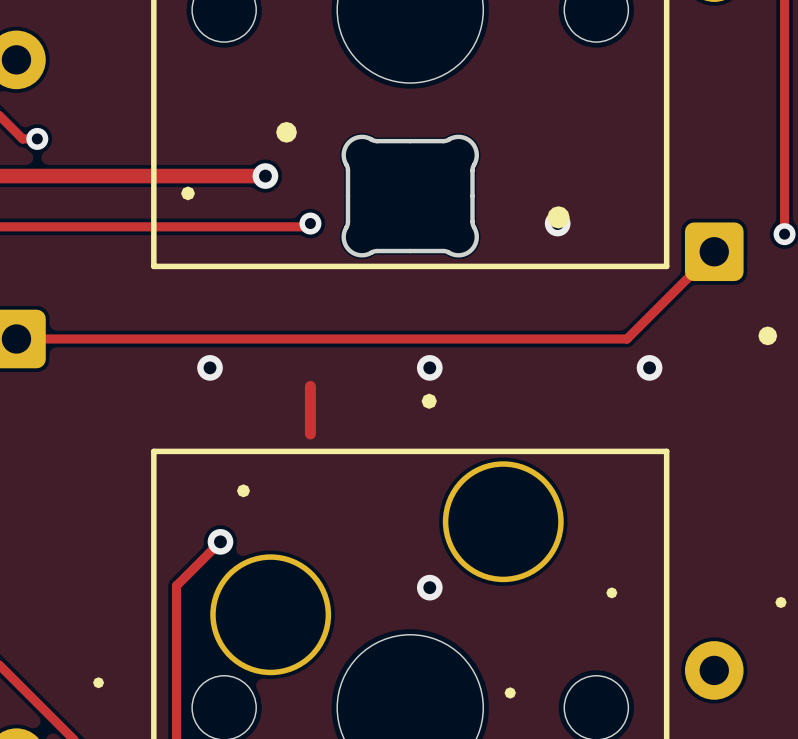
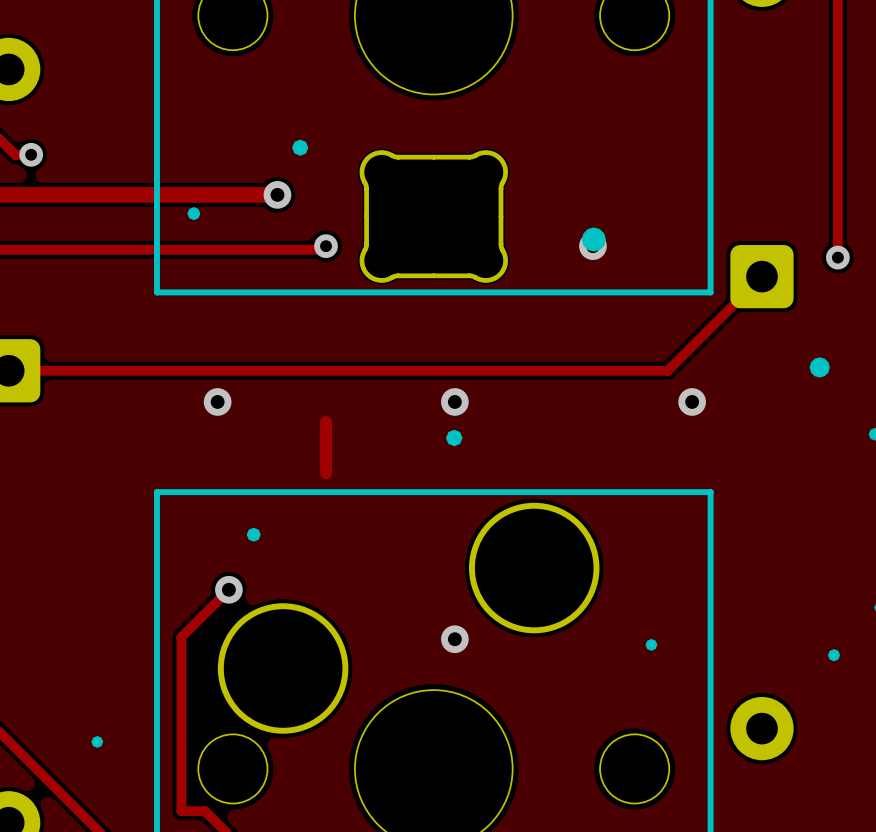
drawing: [276, 121, 297, 143] -> none
drawing: none -> [187, 207, 201, 221]
drawing position: (188, 193) -> (300, 147)
drawing: [504, 687, 516, 699] -> none

